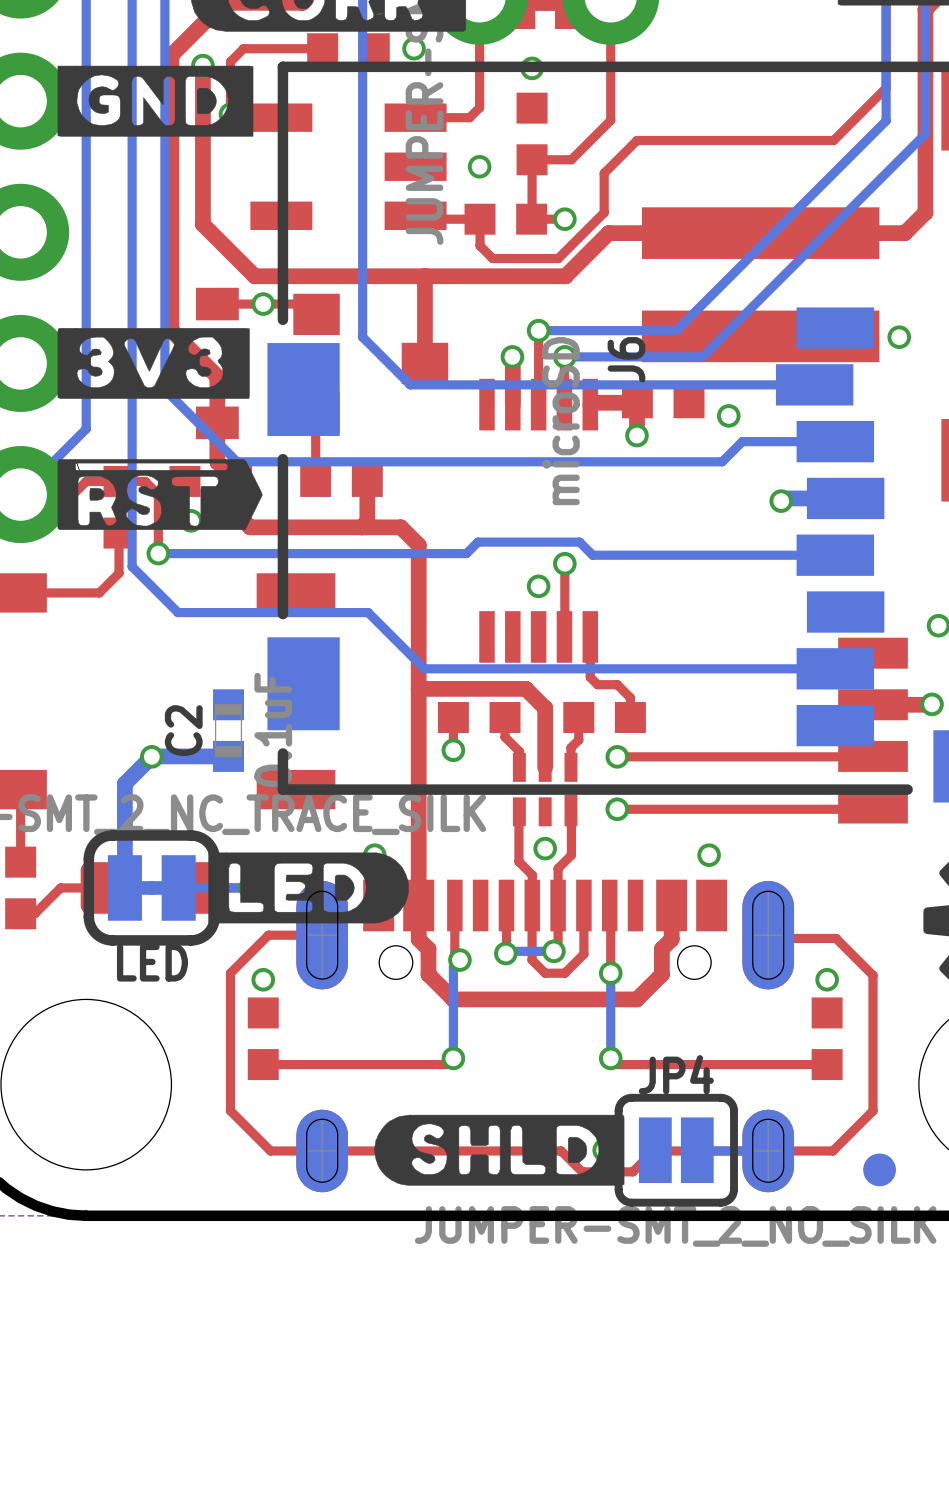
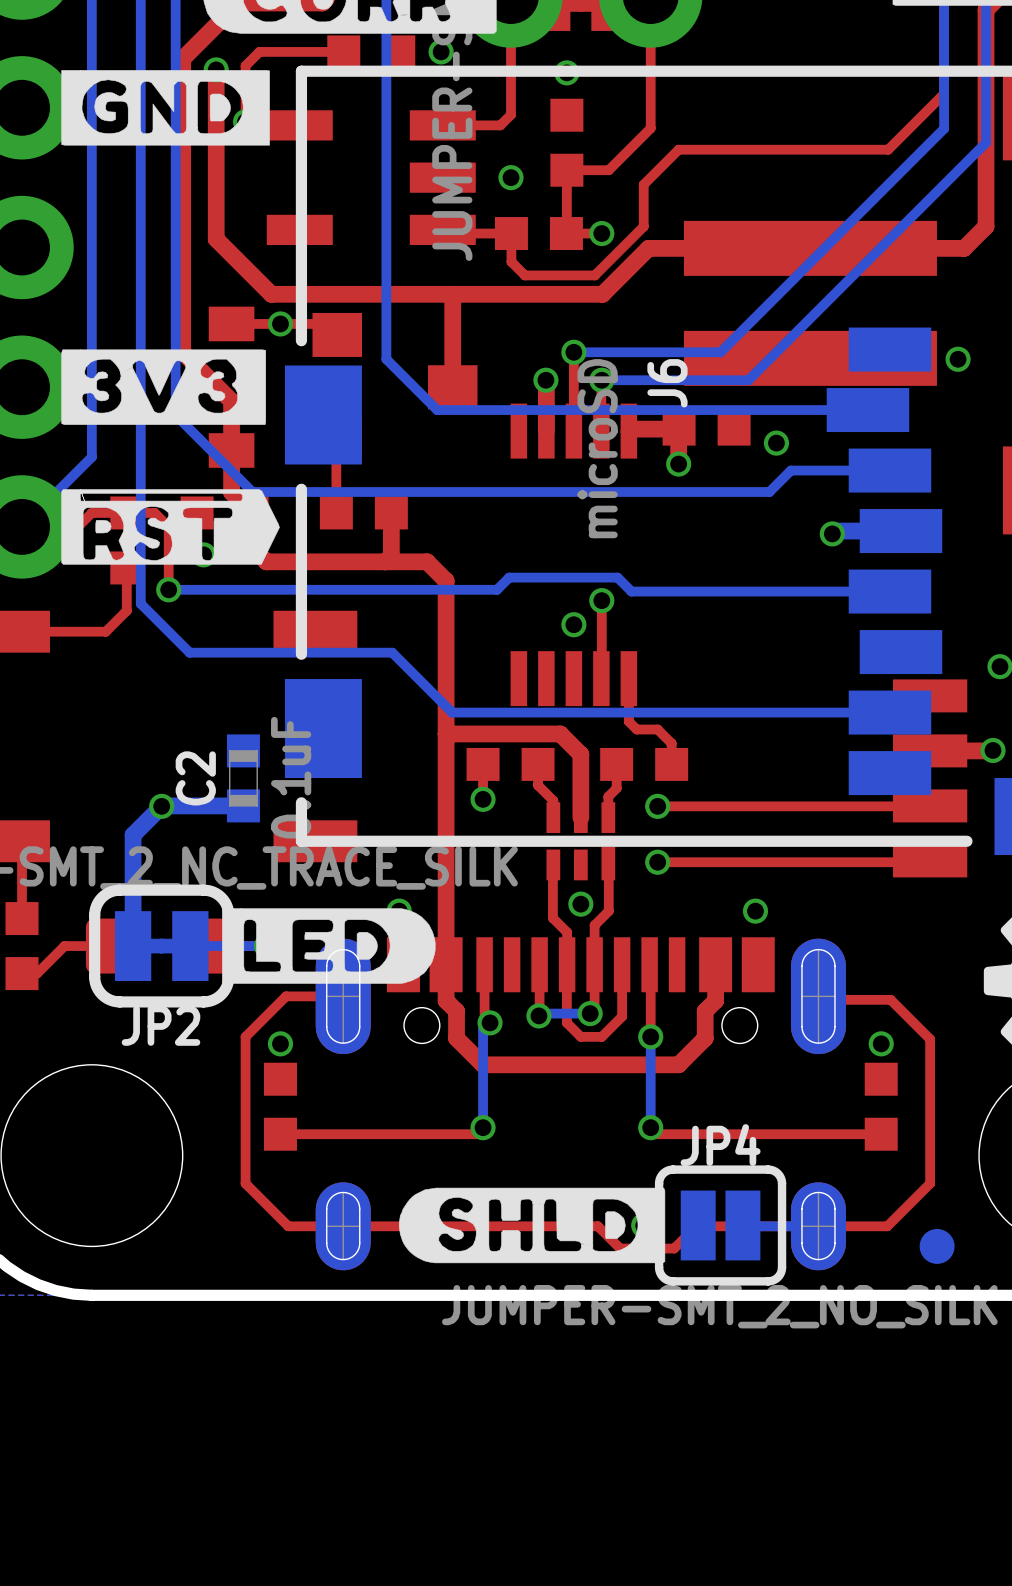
LED name: LED (152, 962) -> JP2 (161, 1025)

